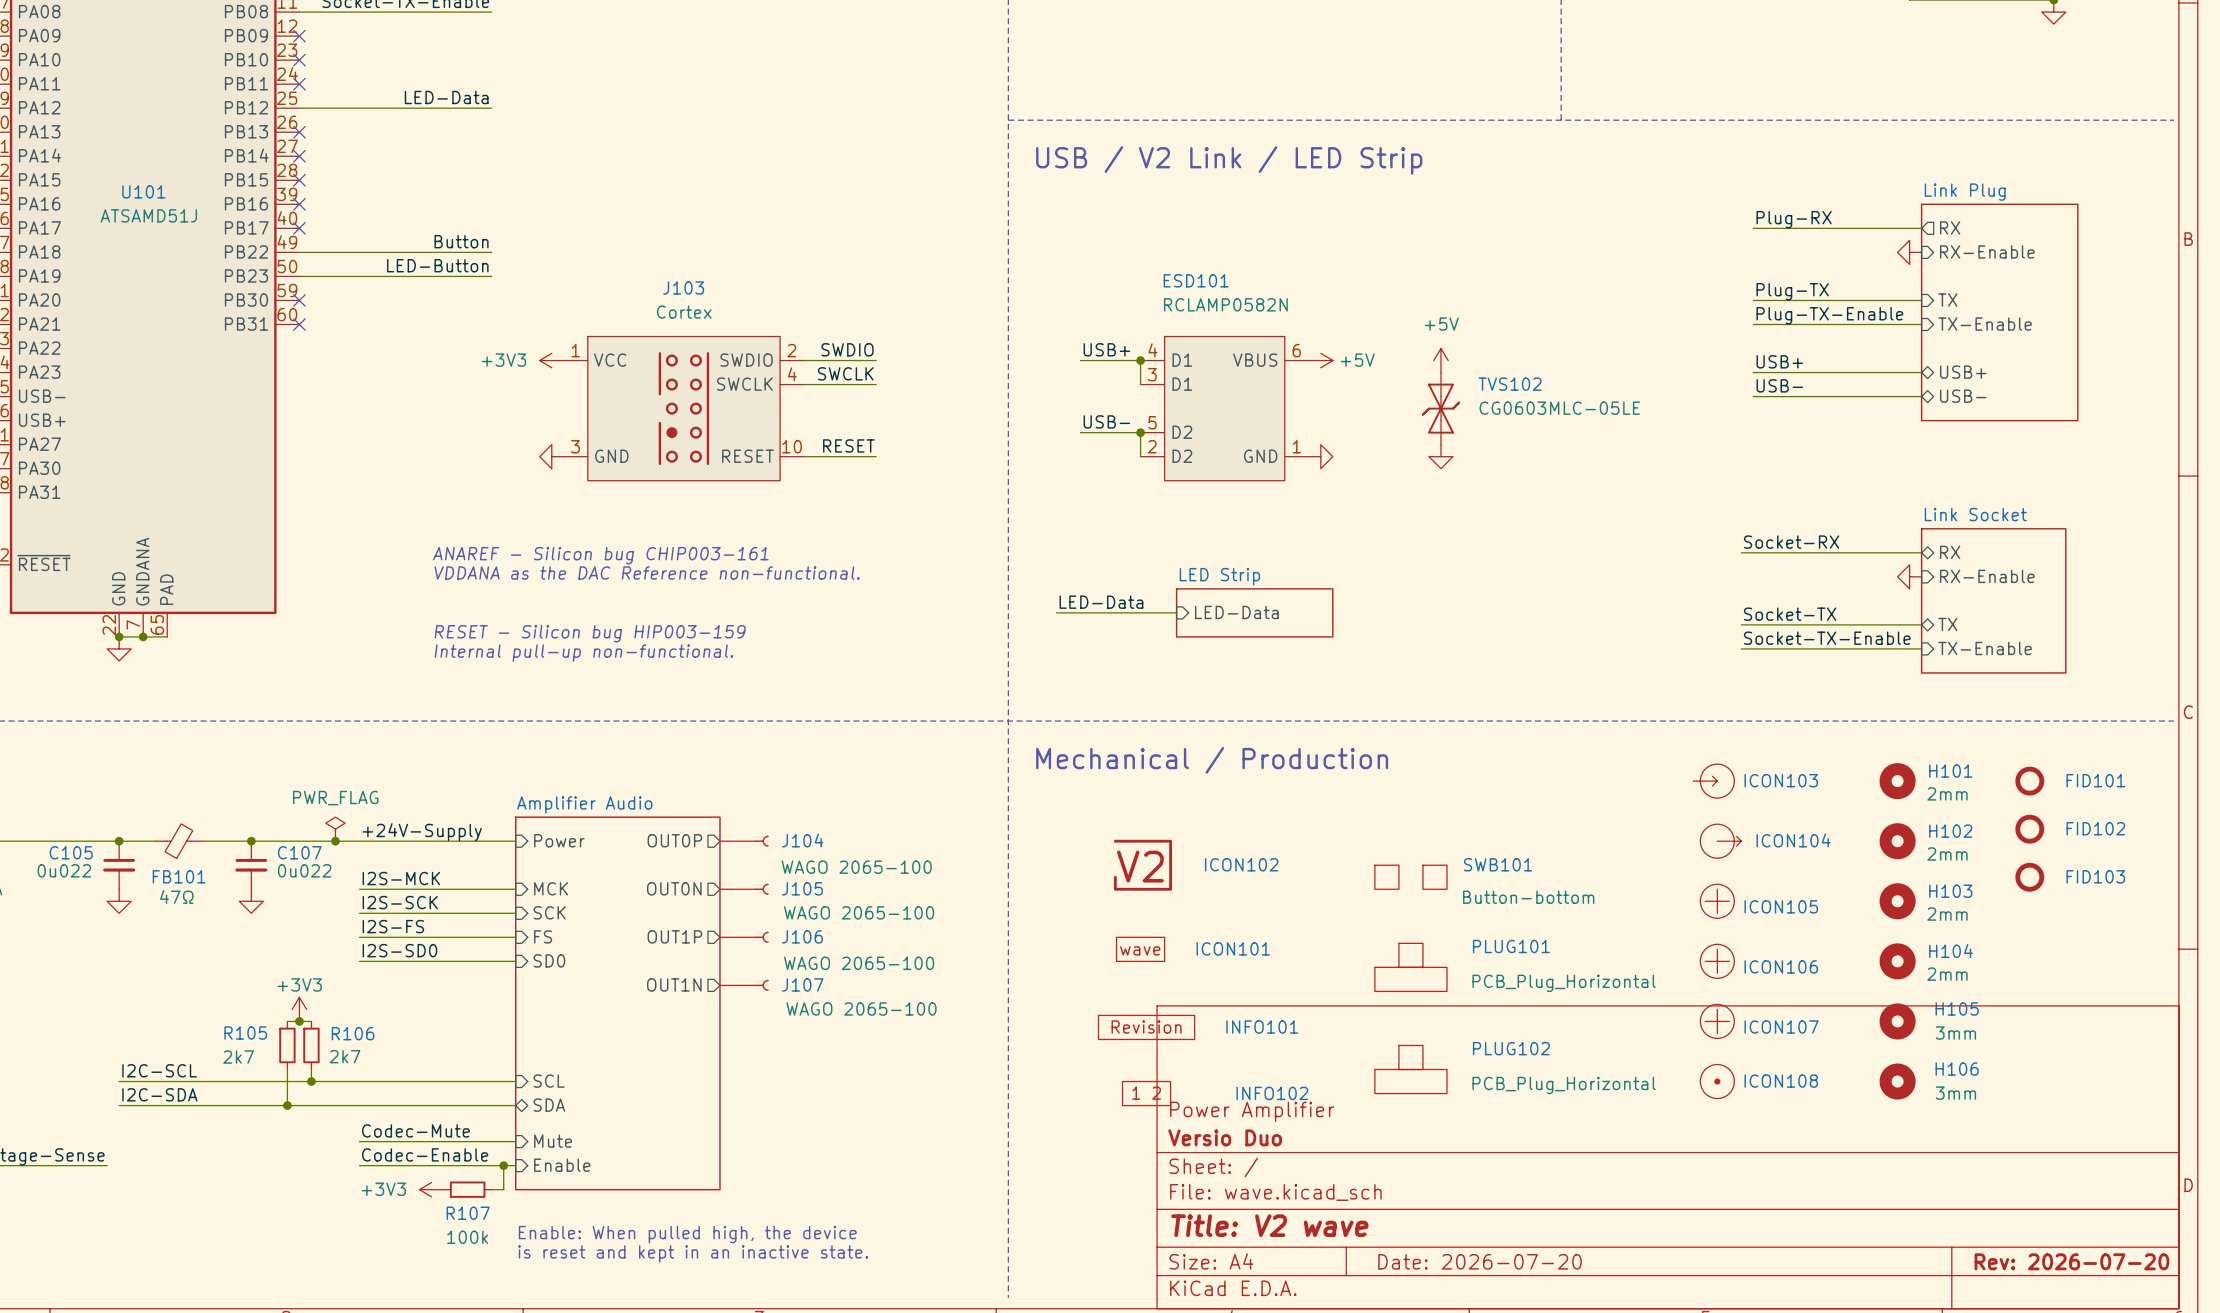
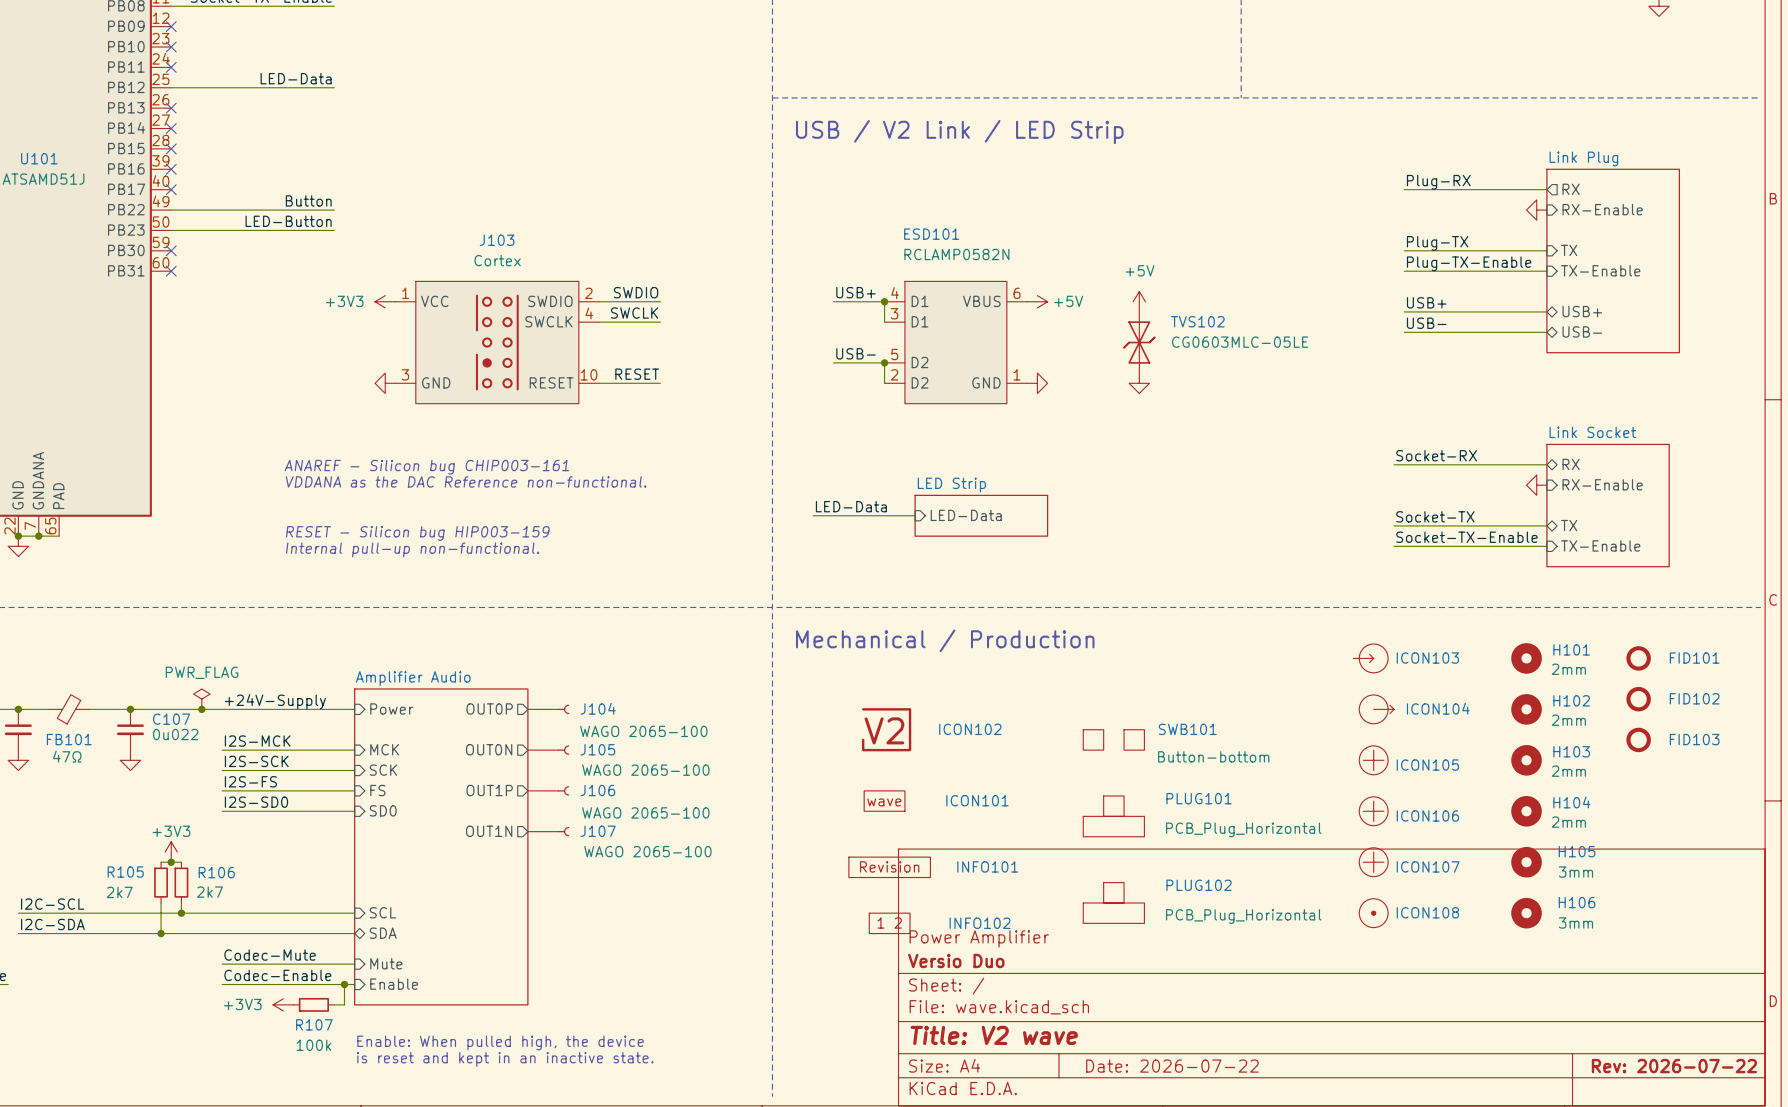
ICON101 name position: ICON101 (1233, 948) -> ICON101 (977, 800)
INFO102 name position: INFO102 (1272, 1093) -> INFO102 (980, 923)
title block: Date: 2026-07-20 (1480, 1261) -> Date: 2026-07-22 (1172, 1066)
title block: Rev: 2026-07-20 (2071, 1261) -> Rev: 2026-07-22 (1674, 1066)

